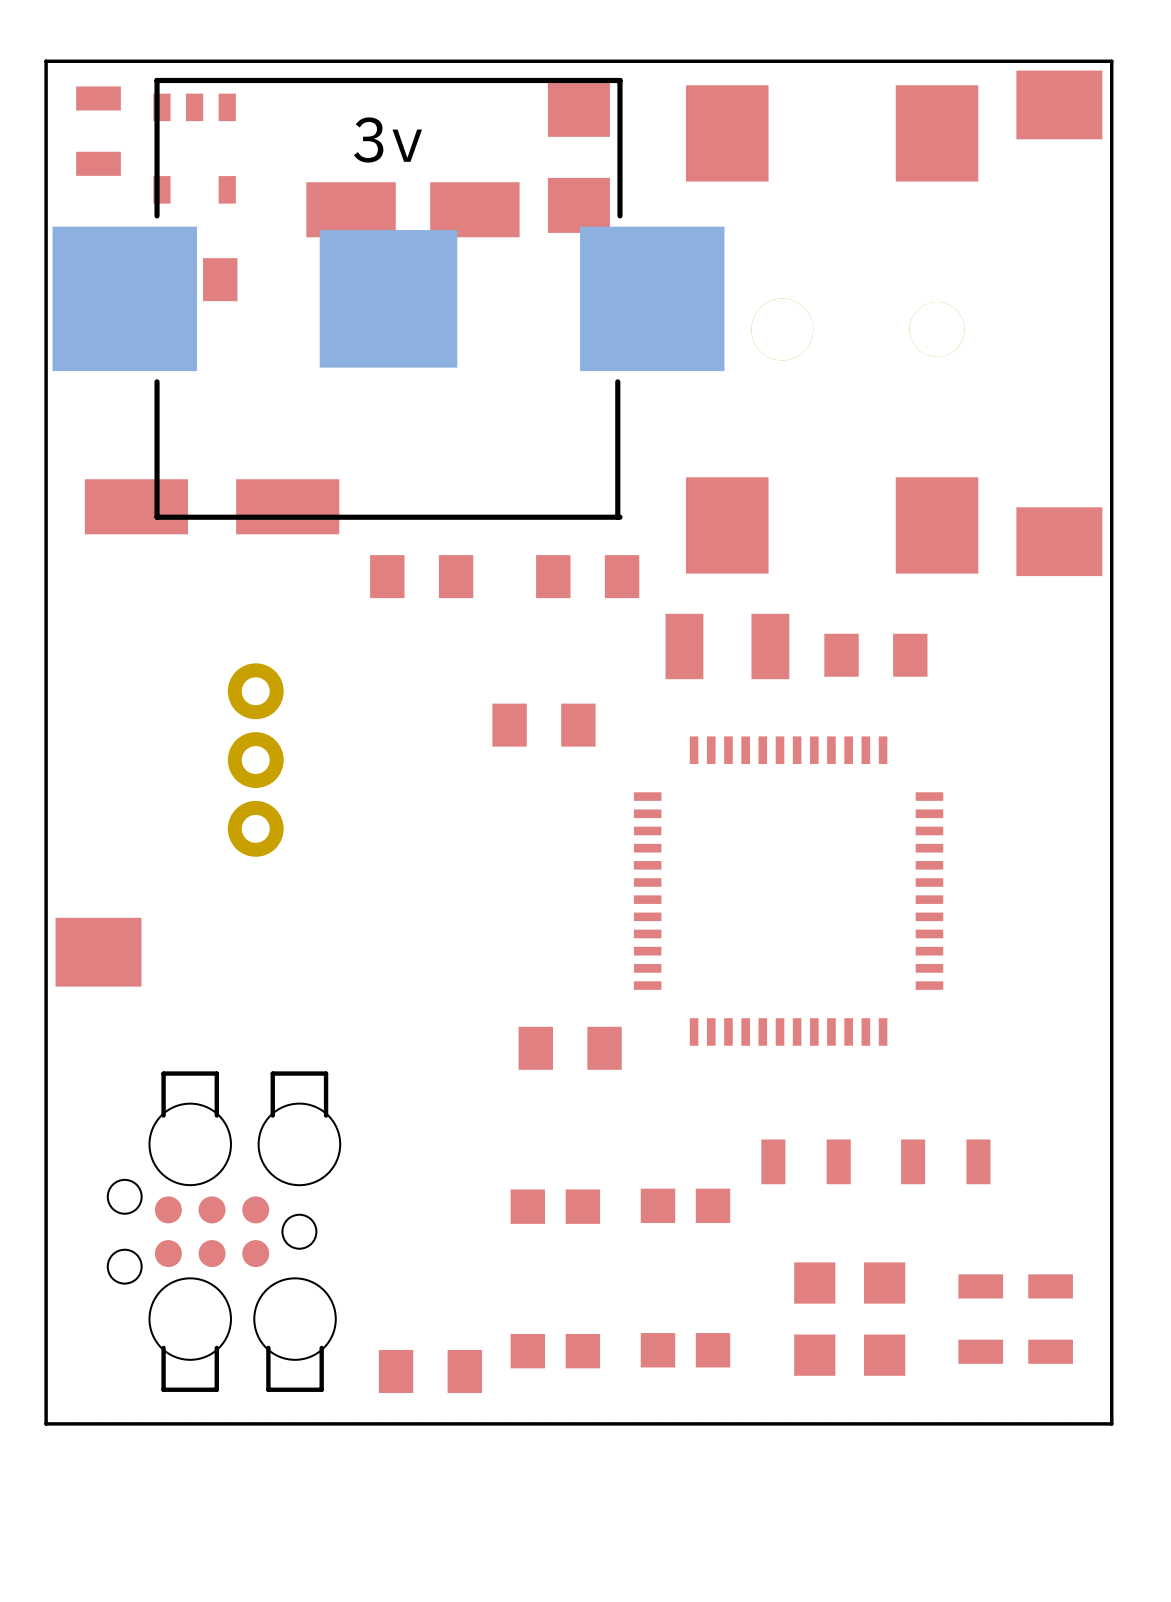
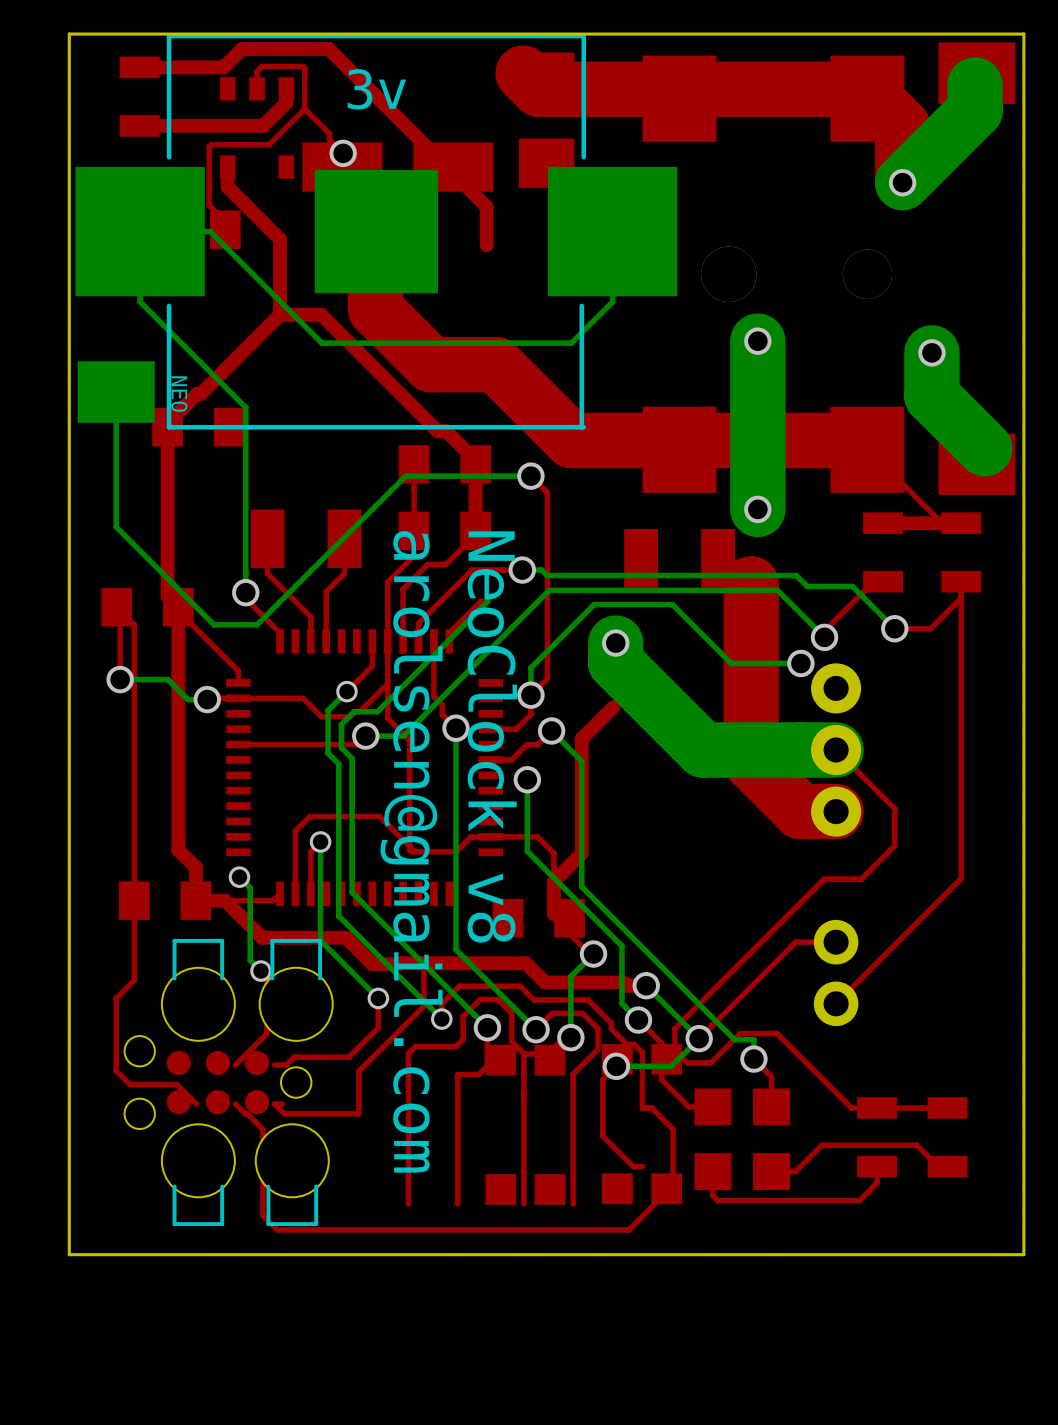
top track: none -> (139, 67) (223, 67) (242, 48) (328, 48) (486, 206) (486, 245)
top track: none -> (523, 73) (539, 89) (865, 89) (902, 126) (902, 182)
bottom track: none -> (974, 84) (974, 110) (902, 182)
top track: none -> (257, 88) (257, 71) (262, 66) (302, 66) (304, 68) (304, 109)
top track: none -> (286, 88) (286, 102) (263, 125) (139, 125)
part position: (98, 131) -> (139, 96)
top track: none -> (304, 109) (329, 133) (329, 139) (343, 153) (343, 212) (375, 245) (375, 309) (431, 364) (495, 364) (571, 440) (865, 440) (865, 446) (941, 523) (961, 523) (883, 523)
top track: none -> (304, 109) (269, 144) (211, 144) (209, 146) (209, 205) (218, 214) (218, 239)
part: (194, 148) -> none
part: none -> (257, 127)
via: none -> (343, 153)
top track: none -> (227, 167) (227, 187) (280, 239) (280, 314)
via: none -> (902, 182)
bottom track: none -> (612, 231) (612, 301) (571, 343) (321, 343) (210, 231) (140, 231) (140, 301) (245, 407) (245, 592)
part position: (388, 298) -> (376, 231)
top track: none -> (280, 314) (321, 314) (437, 431) (446, 431) (475, 460) (475, 530)
top track: none -> (280, 314) (200, 394) (196, 394) (167, 423) (167, 596) (178, 607) (178, 611)
bottom track: none -> (757, 341) (757, 509)
via: none -> (757, 341)
bottom track: none -> (931, 352) (931, 395) (984, 448)
via: none -> (931, 352)
bottom track: none -> (123, 392) (116, 392) (116, 527) (214, 624) (257, 624) (405, 476) (530, 476)
part footprint: [84, 479, 340, 535] -> [152, 407, 245, 447]
top track: none -> (414, 464) (414, 555) (387, 582) (387, 718) (409, 740) (409, 849) (411, 851) (456, 851) (471, 836) (537, 836) (553, 853) (553, 918) (589, 954) (593, 954)
part: none -> (444, 464)
top track: none -> (530, 476) (547, 492) (547, 678) (530, 695) (530, 714) (516, 729) (490, 729)
via: none -> (530, 476)
part: (421, 576) -> none
part: (587, 576) -> none
via: none -> (757, 509)
part: none -> (444, 530)
top track: none -> (475, 530) (475, 534) (445, 564) (427, 564) (403, 589) (403, 641)
top track: none -> (267, 538) (267, 573) (310, 616) (310, 641)
part: none -> (305, 538)
top track: none -> (344, 538) (344, 573) (326, 591) (326, 641)
part: none -> (883, 552)
part: none -> (961, 552)
part: (875, 655) -> none
bottom track: none -> (522, 570) (541, 570) (547, 575) (796, 575) (807, 586) (852, 586) (894, 628)
top track: none -> (522, 570) (471, 570) (418, 623) (418, 641)
via: none -> (522, 570)
top track: none -> (883, 581) (873, 581) (824, 630) (824, 637)
top track: none -> (961, 581) (961, 878) (836, 1003)
top track: none -> (751, 583) (751, 762) (800, 811) (836, 811)
top track: none -> (245, 592) (245, 598) (280, 632) (280, 641)
via: none -> (245, 592)
top track: none -> (961, 598) (930, 628) (894, 628)
bottom track: none -> (487, 601) (377, 711) (354, 711) (341, 724) (341, 747) (352, 758) (352, 892) (487, 1027)
top track: none -> (487, 601) (480, 601) (449, 632) (449, 641)
top track: none -> (116, 607) (134, 624) (134, 980) (116, 998) (116, 1070) (129, 1084) (176, 1084) (196, 1104)
part: none -> (147, 607)
top track: none -> (120, 610) (120, 679)
top track: none -> (178, 611) (238, 671) (238, 682)
top track: none -> (178, 611) (178, 849) (195, 867) (195, 900)
part: (543, 725) -> none
via: none -> (894, 628)
bottom track: none -> (824, 637) (777, 590) (549, 590) (403, 736) (365, 736)
via: none -> (824, 637)
top track: none -> (372, 641) (372, 666) (346, 691)
top track: none -> (433, 641) (433, 696) (442, 704) (442, 714) (456, 728)
bottom track: none -> (615, 643) (615, 662) (703, 750) (836, 750)
via: none -> (615, 643)
part position: (255, 760) -> (836, 750)
bottom track: none -> (800, 663) (731, 663) (672, 604) (594, 604) (530, 667) (530, 695)
via: none -> (800, 663)
bottom track: none -> (120, 679) (167, 679) (187, 699) (207, 699)
via: none -> (120, 679)
top track: none -> (387, 683) (359, 712) (354, 712) (350, 716) (321, 716) (303, 698) (207, 699)
bottom track: none -> (346, 691) (328, 710) (328, 753) (338, 763) (338, 916) (441, 1019)
via: none -> (346, 691)
via: none -> (530, 695)
via: none -> (207, 699)
top track: none -> (613, 706) (581, 738) (581, 853) (553, 881) (553, 914)
bottom track: none -> (456, 728) (456, 949) (536, 1029)
via: none -> (456, 728)
bottom track: none -> (551, 730) (581, 761) (581, 886) (734, 1039) (753, 1039) (753, 1059)
top track: none -> (551, 730) (537, 744) (526, 744) (511, 759) (490, 759)
via: none -> (551, 730)
top track: none -> (365, 736) (357, 744) (238, 744)
via: none -> (365, 736)
text: none -> NeoClock v8 (492, 736)
top track: none -> (836, 750) (894, 808) (894, 845) (861, 879) (824, 879) (674, 1028) (674, 1050) (687, 1062) (710, 1062) (740, 1033) (777, 1033) (851, 1108) (947, 1108)
part position: (788, 891) -> (364, 767)
bottom track: none -> (527, 779) (527, 851) (621, 946) (621, 1003) (638, 1020)
via: none -> (527, 779)
part side: top (98, 952) -> bottom (116, 392)
bottom track: none -> (320, 841) (320, 940) (378, 998)
top track: none -> (320, 841) (310, 851) (310, 893)
via: none -> (320, 841)
top track: none -> (414, 851) (379, 816) (309, 816) (295, 830) (295, 893)
text: none -> arolsen@gmail.com (411, 851)
bottom track: none -> (239, 877) (250, 887) (250, 960) (260, 971)
via: none -> (239, 877)
top track: none -> (280, 893) (273, 900) (195, 900)
part: none -> (165, 900)
top track: none -> (195, 900) (225, 900) (262, 937) (346, 937) (372, 964) (526, 963) (545, 982) (623, 982) (626, 985) (646, 985)
top track: none -> (836, 942) (795, 942) (699, 1038)
bottom track: none -> (593, 954) (570, 976) (570, 1037)
via: none -> (593, 954)
top track: none -> (423, 963) (423, 1006) (358, 1071) (358, 1113) (284, 1113) (274, 1104) (282, 1104)
top track: none -> (260, 971) (266, 976) (266, 1033) (235, 1064)
via: none -> (260, 971)
part: none -> (836, 973)
bottom track: none -> (646, 985) (699, 1038) (671, 1066) (616, 1066)
via: none -> (646, 985)
top track: none -> (378, 998) (378, 1027) (349, 1057) (294, 1057) (286, 1064) (274, 1064)
via: none -> (378, 998)
top track: none -> (441, 1019) (441, 1003) (459, 986) (520, 986) (534, 1000) (588, 1000) (611, 1023) (611, 1028) (626, 1044) (634, 1044) (642, 1052) (642, 1108) (651, 1108) (673, 1129) (673, 1185) (628, 1229) (277, 1229) (262, 1215) (262, 1129) (235, 1104)
via: none -> (441, 1019)
part: (806, 1161) -> none
part: (945, 1161) -> none
top track: none -> (638, 1020) (661, 1043) (661, 1079) (688, 1106) (712, 1106)
via: none -> (638, 1020)
top track: none -> (487, 1027) (487, 1065) (478, 1074) (457, 1074) (457, 1203)
via: none -> (487, 1027)
top track: none -> (536, 1029) (552, 1013) (582, 1013) (598, 1028) (598, 1049) (573, 1074) (573, 1203)
via: none -> (536, 1029)
top track: none -> (570, 1037) (564, 1037) (547, 1054) (524, 1054) (511, 1041) (511, 1013) (498, 999) (480, 999) (463, 1016) (463, 1039) (456, 1046) (415, 1046) (408, 1053) (408, 1203)
via: none -> (570, 1037)
via: none -> (699, 1038)
top track: none -> (523, 1053) (523, 1203)
top track: none -> (753, 1059) (771, 1076) (771, 1106)
via: none -> (753, 1059)
top track: none -> (616, 1066) (602, 1080) (602, 1136) (633, 1166) (642, 1166)
via: none -> (616, 1066)
part: none -> (877, 1137)
part: none -> (947, 1137)
part: none -> (712, 1139)
part: none -> (771, 1139)
part: (814, 1319) -> none
part: (884, 1319) -> none
part: (980, 1319) -> none
part: (1050, 1319) -> none
top track: none -> (877, 1166) (877, 1182) (859, 1200) (717, 1200) (712, 1195) (712, 1171)
top track: none -> (947, 1166) (938, 1166) (916, 1145) (821, 1145) (795, 1171) (771, 1171)
part: (430, 1371) -> none

